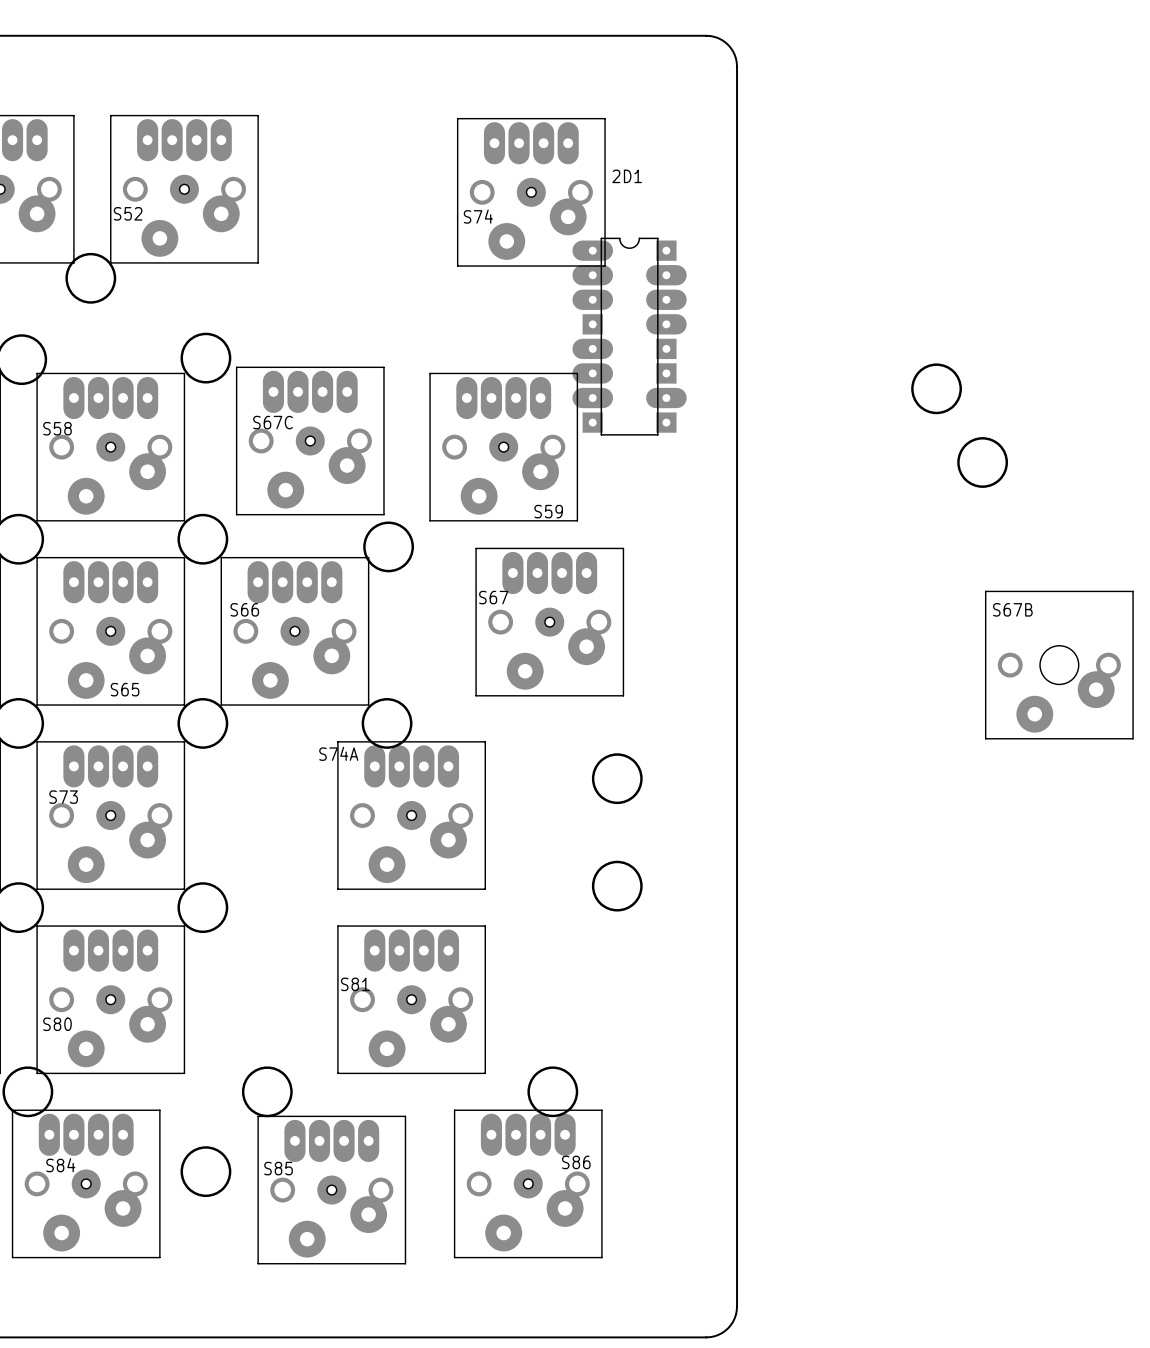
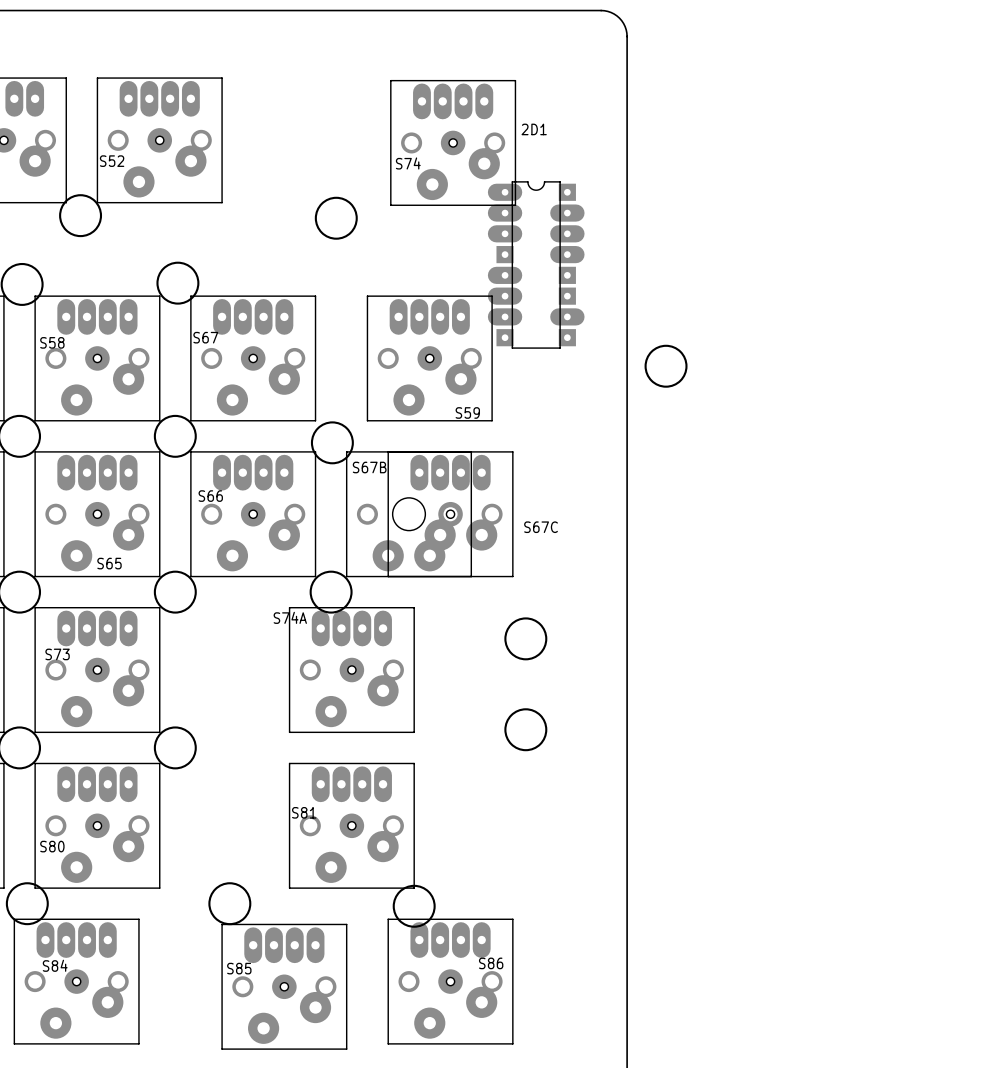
round board edge: none -> [314, 196, 358, 240]
round board edge: [911, 363, 962, 415] -> none
S67C name position: S67C (273, 422) -> S67C (541, 527)
round board edge: none -> [644, 344, 688, 388]
round board edge: [957, 437, 1009, 488] -> none
S67C position: (310, 441) -> (450, 514)
S67 position: (549, 622) -> (253, 358)
S67B position: (1059, 665) -> (408, 514)
round board edge position: (552, 1091) -> (414, 906)
round board edge: [180, 1146, 232, 1198] -> none

